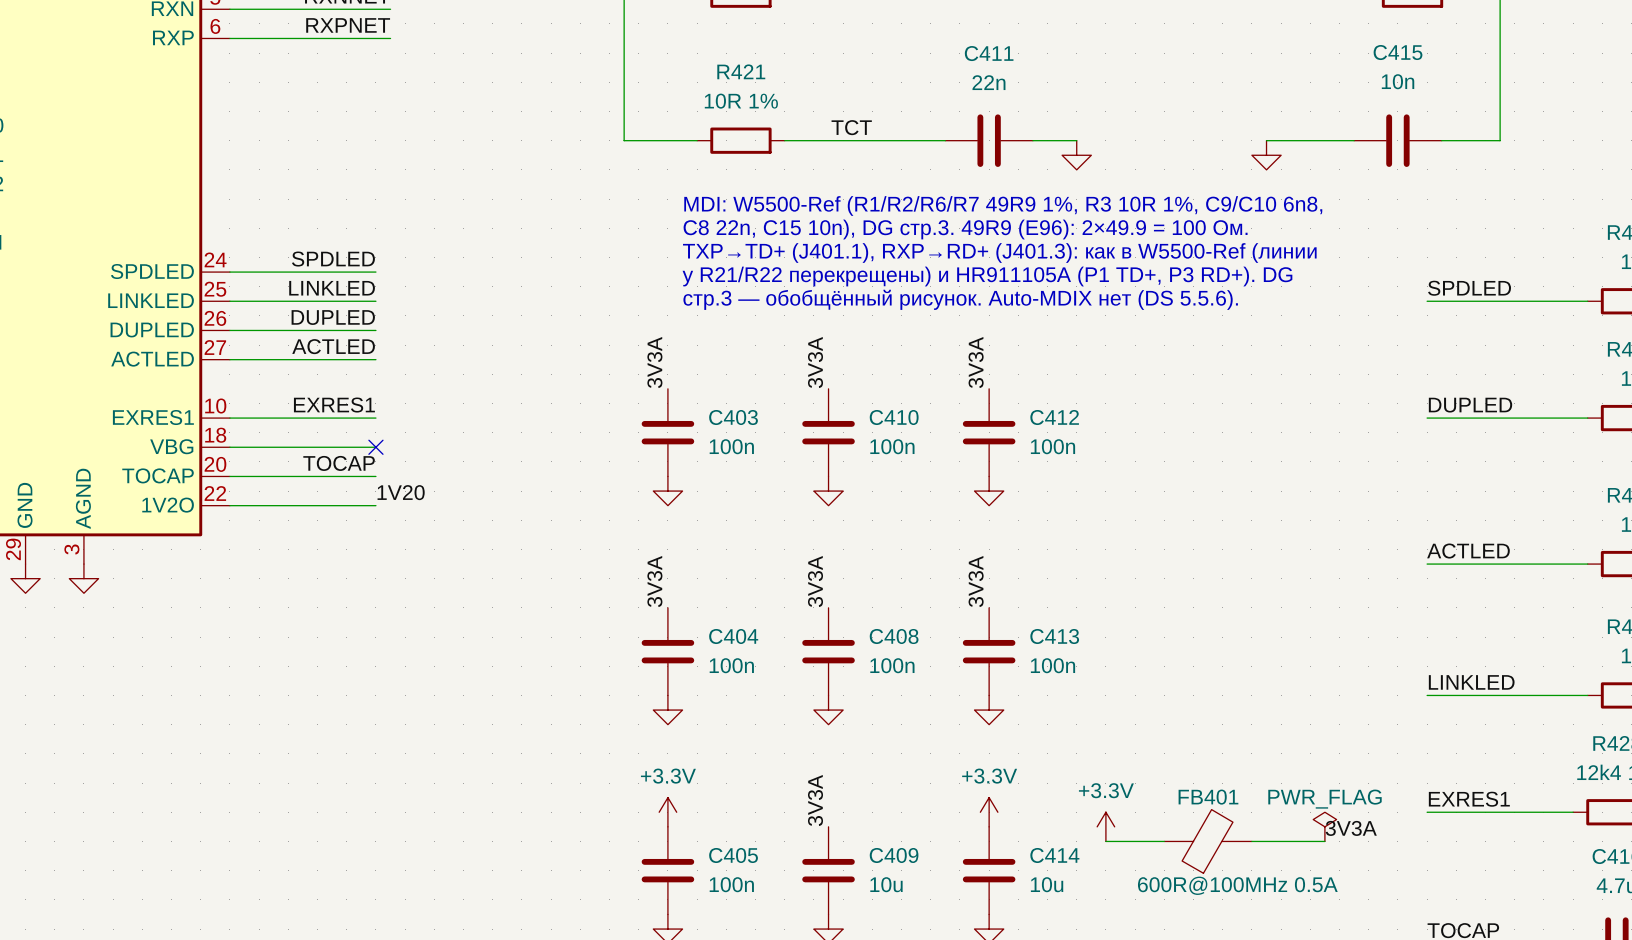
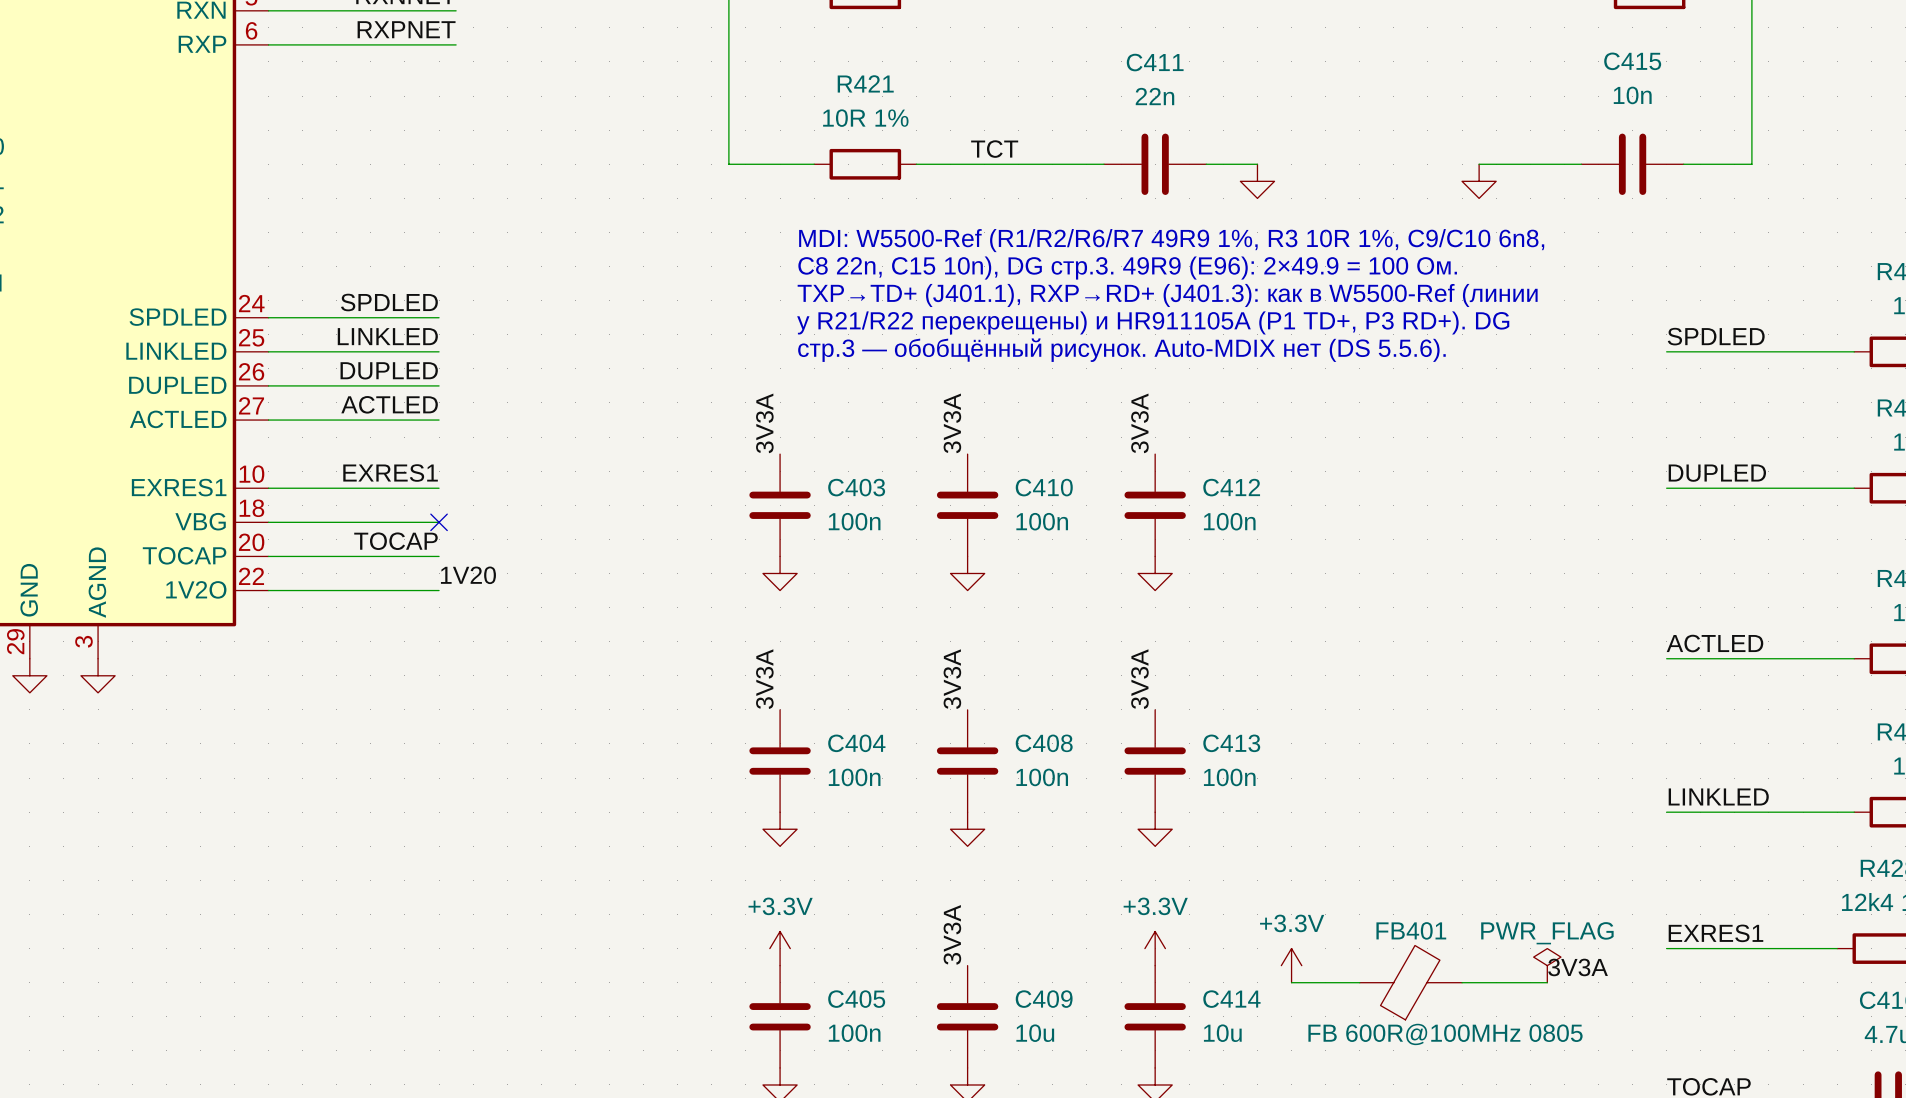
FB401 value: 600R@100MHz 0.5A (1237, 885) -> FB 600R@100MHz 0805 (1445, 1034)

